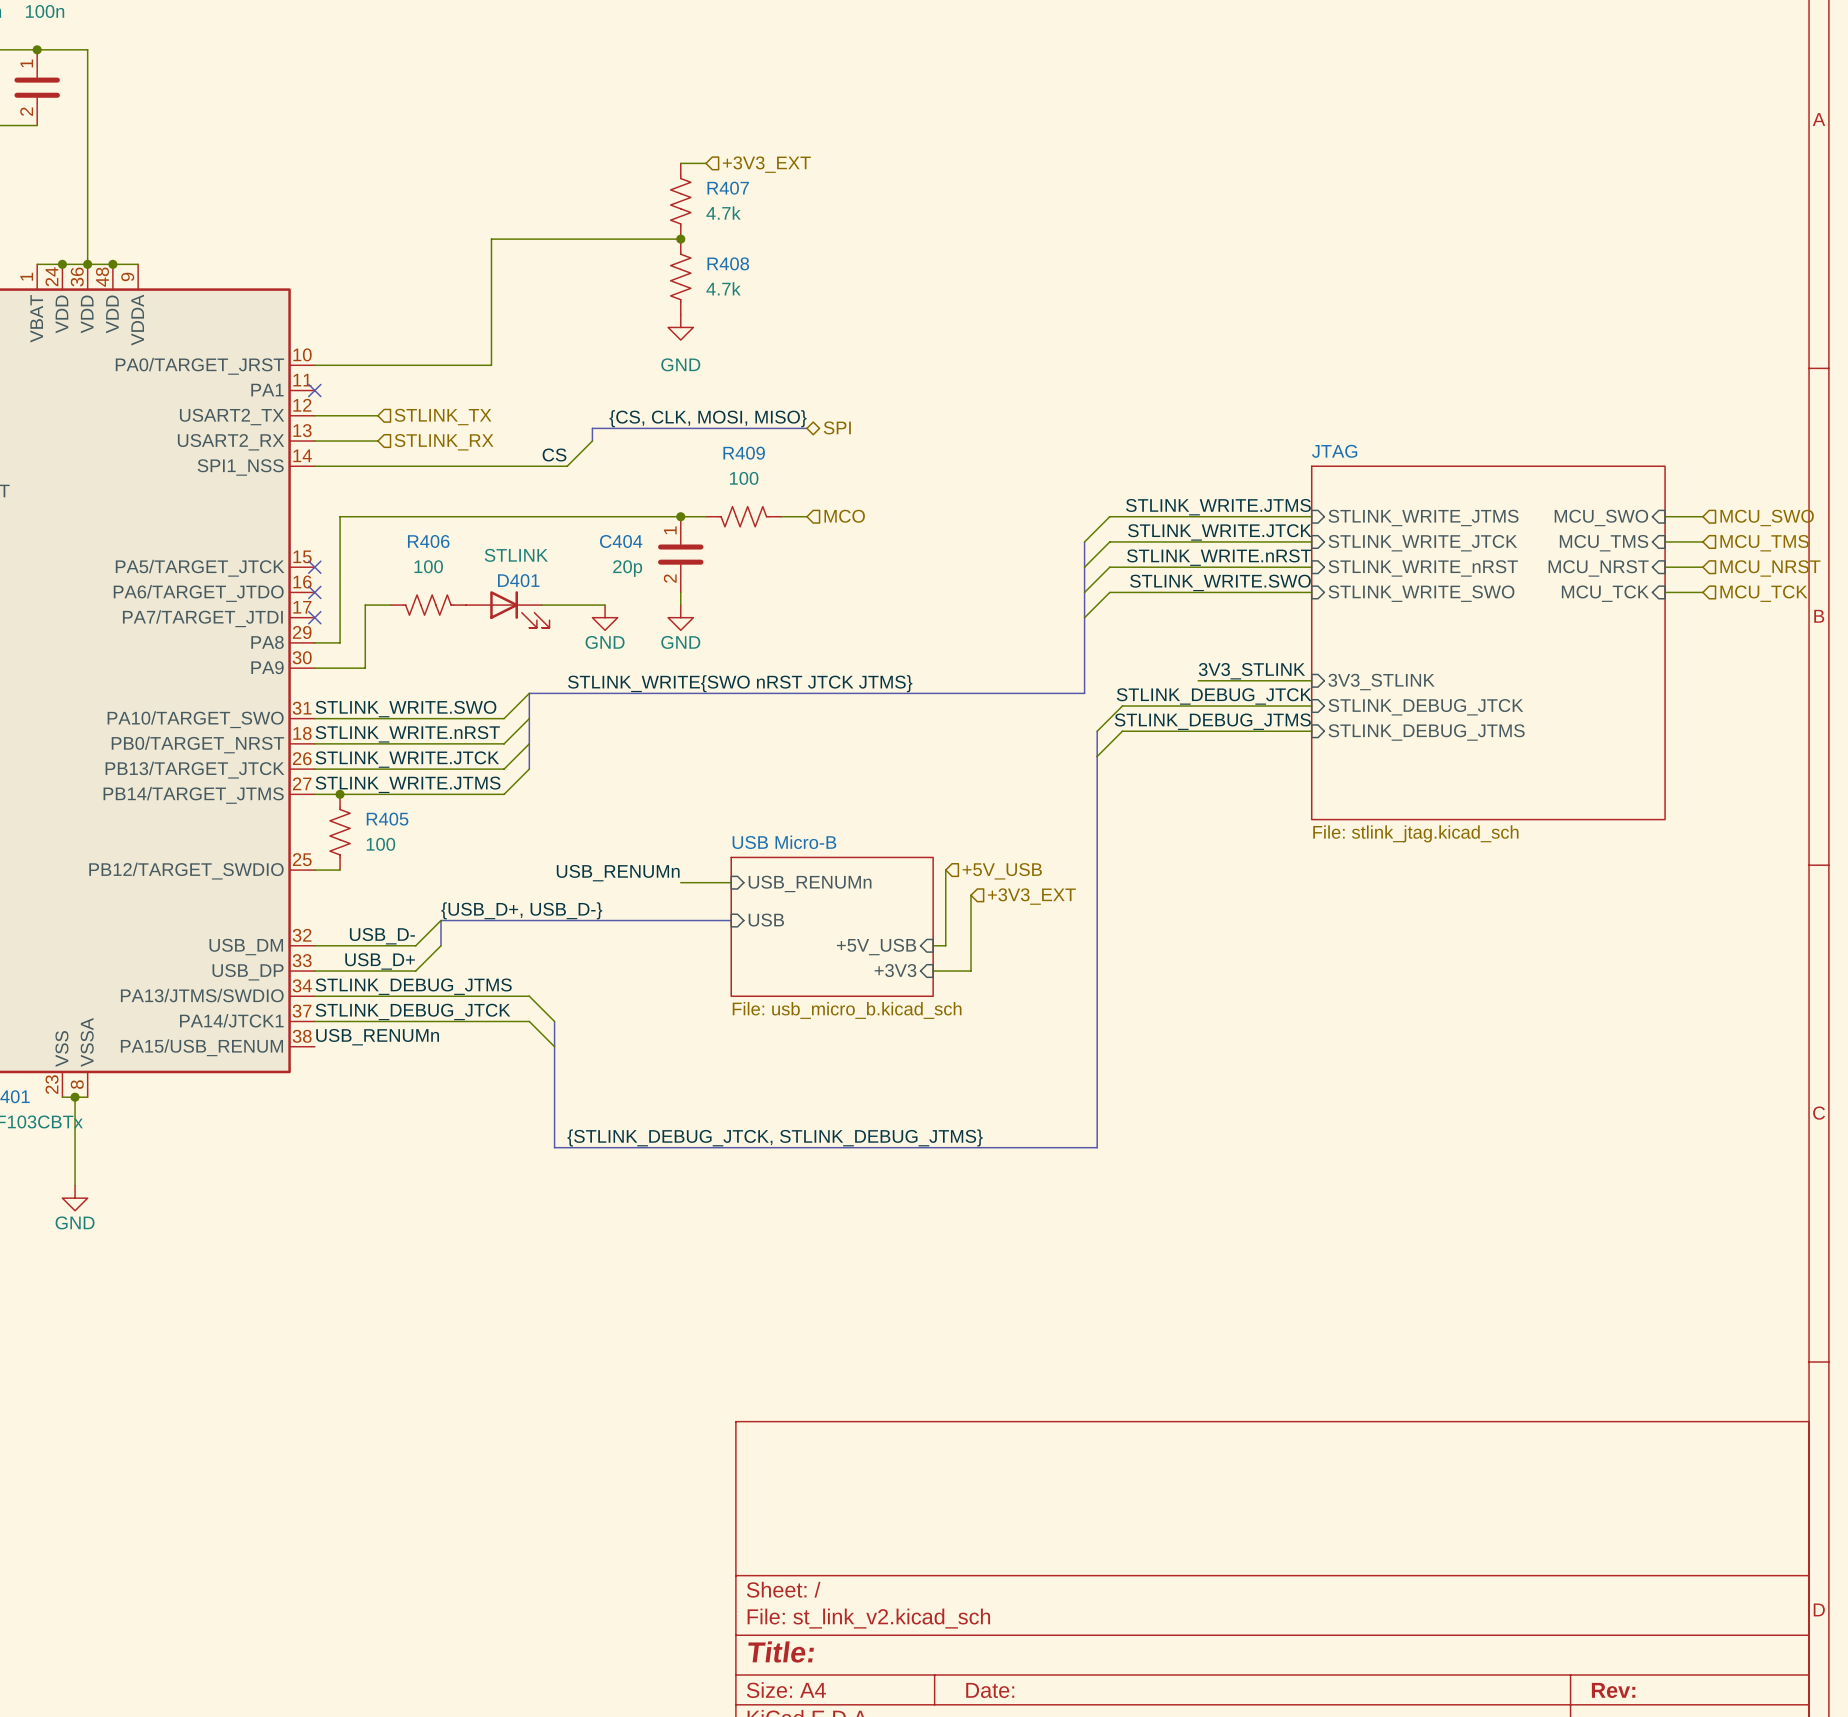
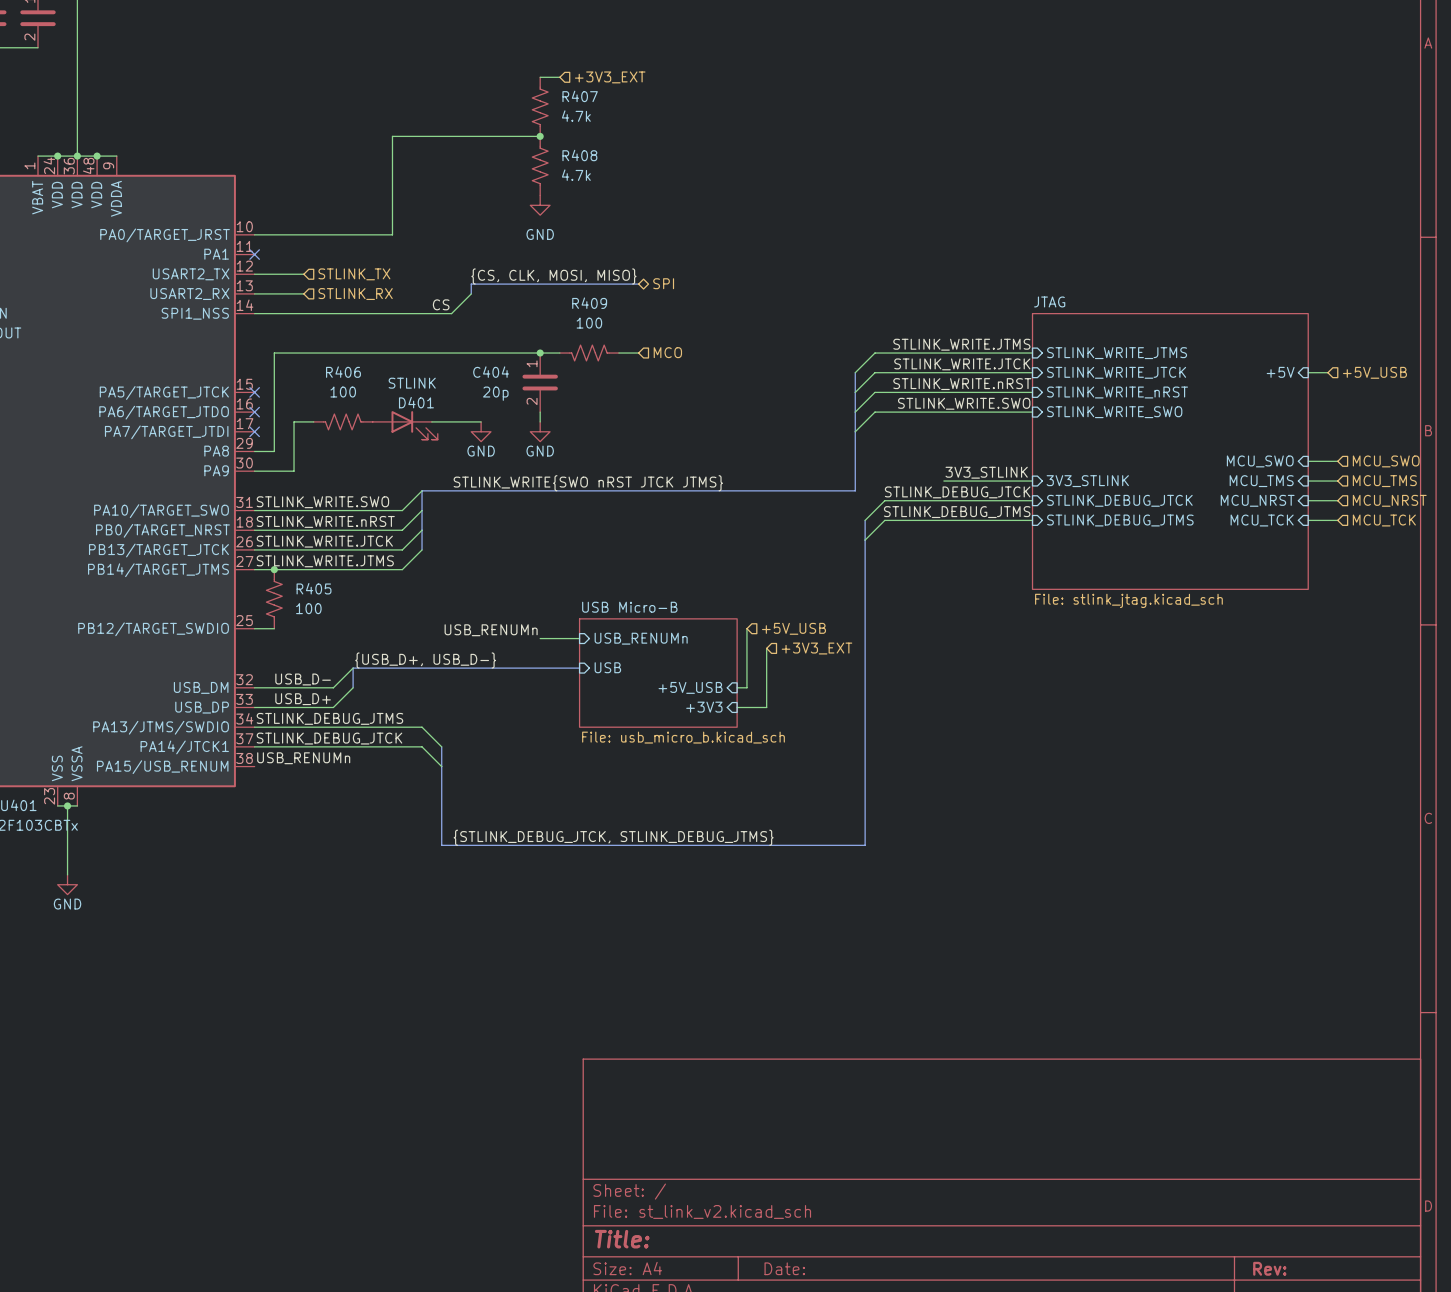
wire: (1665, 516) (1702, 516) -> (1308, 461) (1337, 461)
sheet pin position: MCU_SWO (1601, 517) -> MCU_SWO (1260, 461)
hierarchical label position: MCU_SWO (1767, 517) -> MCU_SWO (1386, 461)
wire: (1690, 541) (1702, 541) -> none
sheet pin: MCU_TMS (1604, 543) -> +5V (1280, 372)
hierarchical label: none -> +5V_USB (1374, 372)
hierarchical label position: MCU_TMS (1764, 543) -> MCU_TMS (1384, 481)
wire: (1665, 567) (1702, 567) -> (1308, 500) (1337, 500)
sheet pin position: MCU_NRST (1598, 568) -> MCU_NRST (1257, 500)
hierarchical label position: MCU_NRST (1770, 568) -> MCU_NRST (1389, 500)
wire: (1665, 592) (1702, 592) -> (1308, 520) (1337, 520)
sheet pin position: MCU_TCK (1605, 593) -> MCU_TCK (1262, 520)
hierarchical label position: MCU_TCK (1763, 593) -> MCU_TCK (1384, 520)
wire: none -> (1308, 481) (1337, 481)
sheet pin: none -> MCU_TMS (1261, 481)

